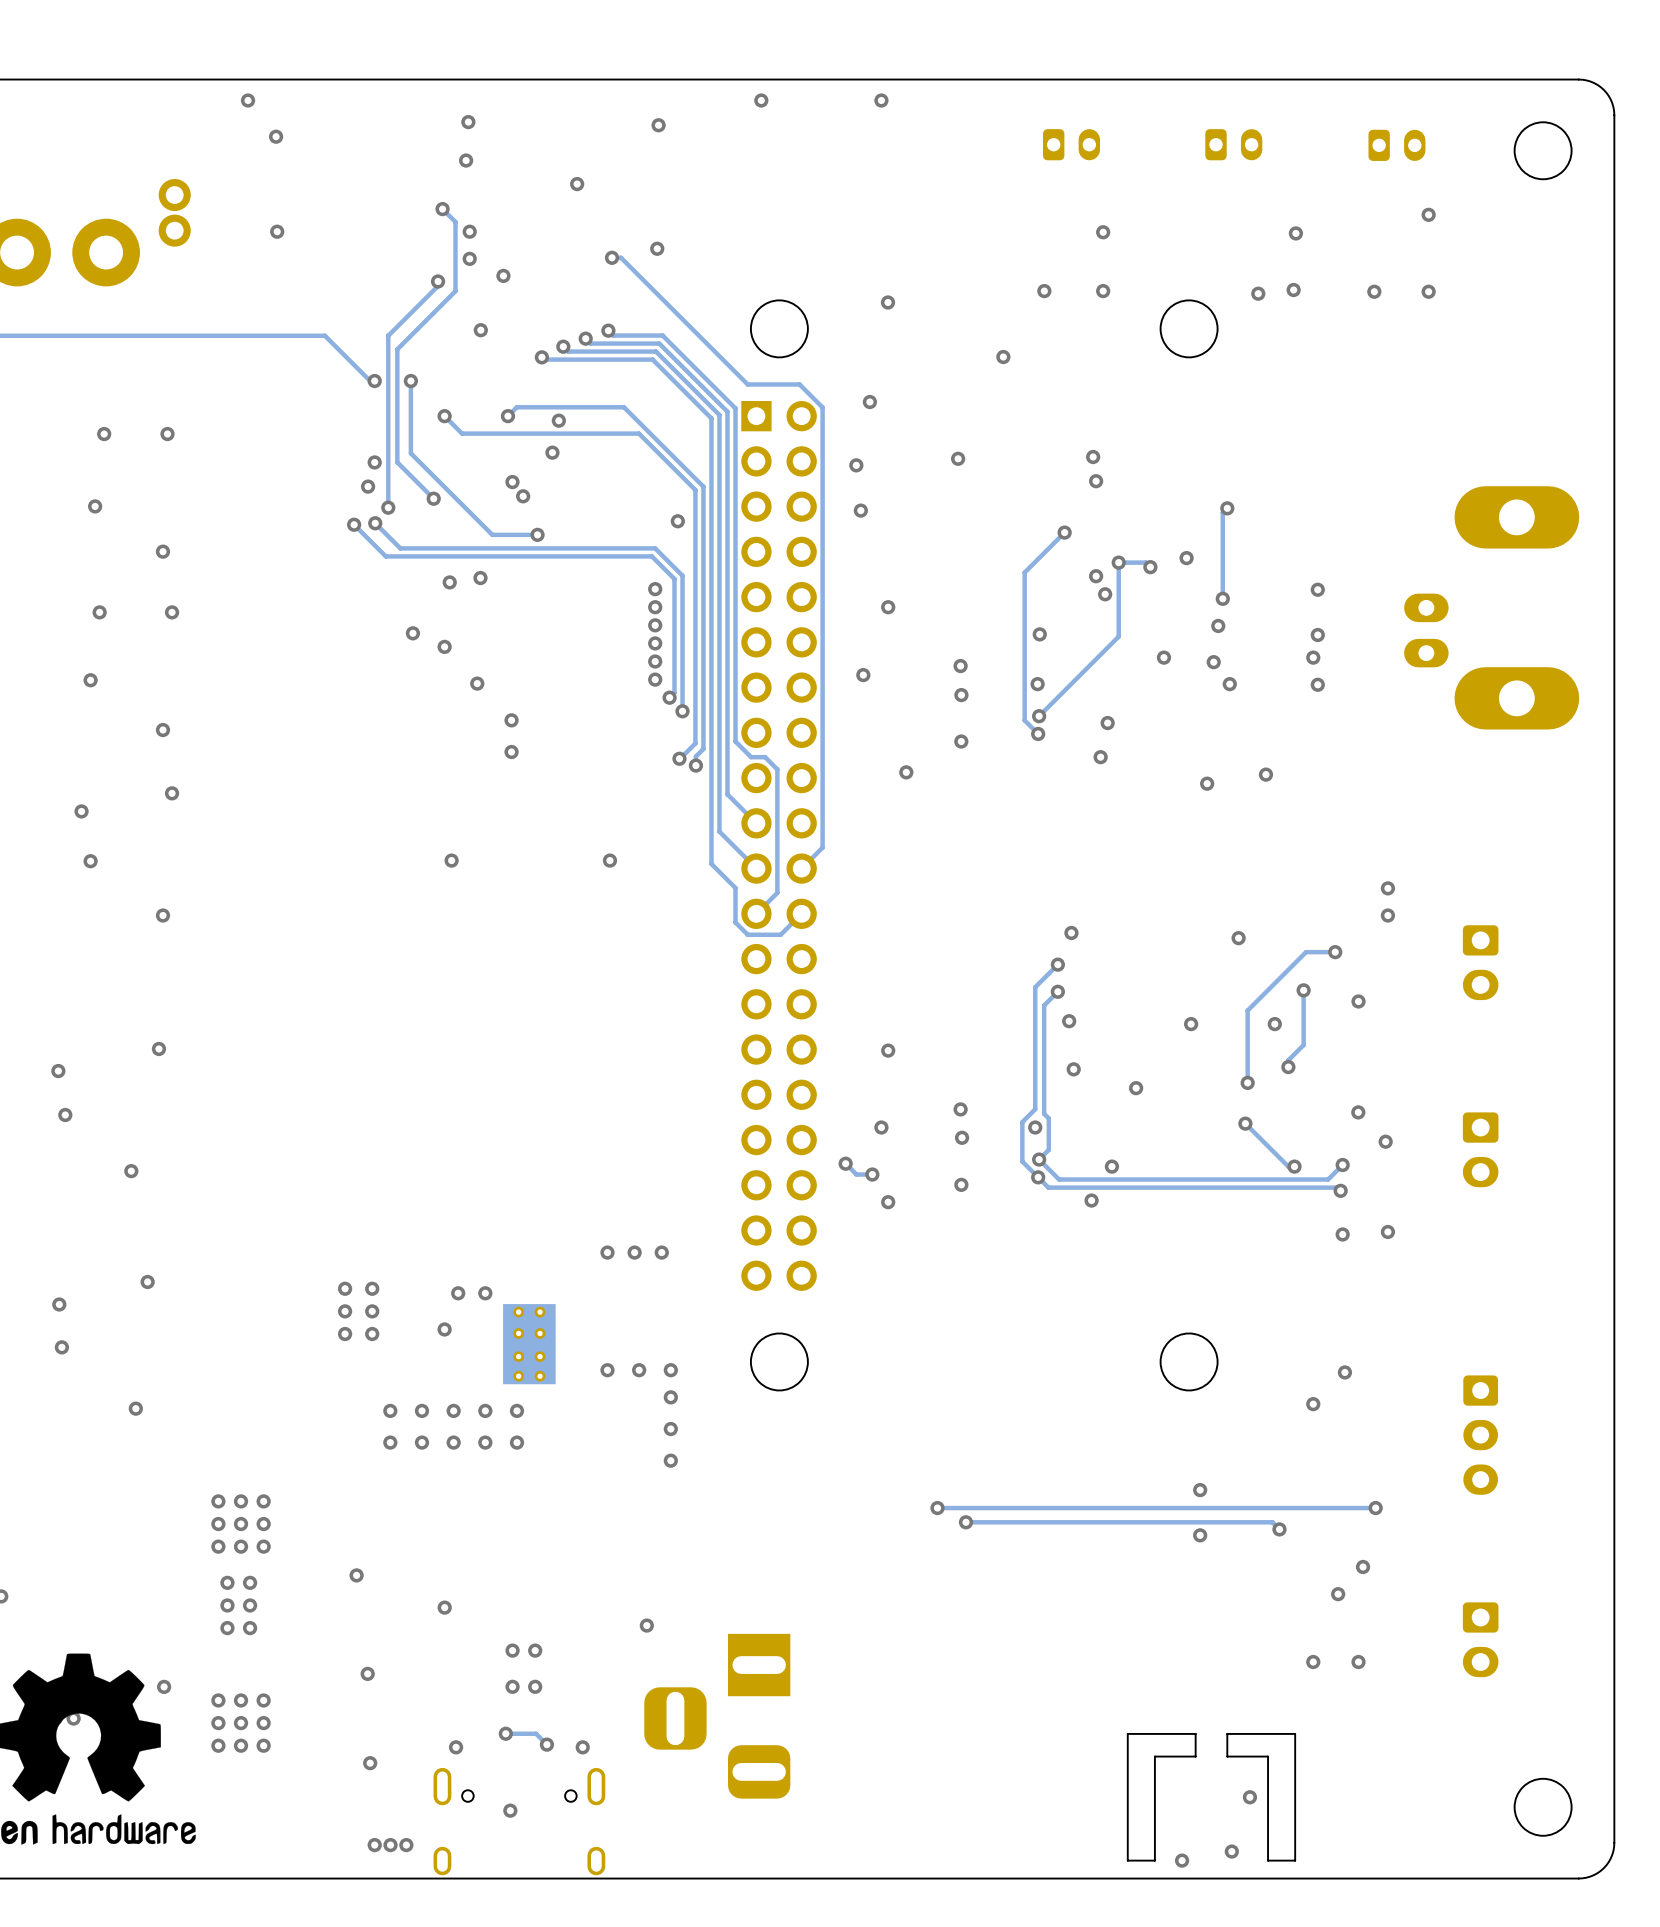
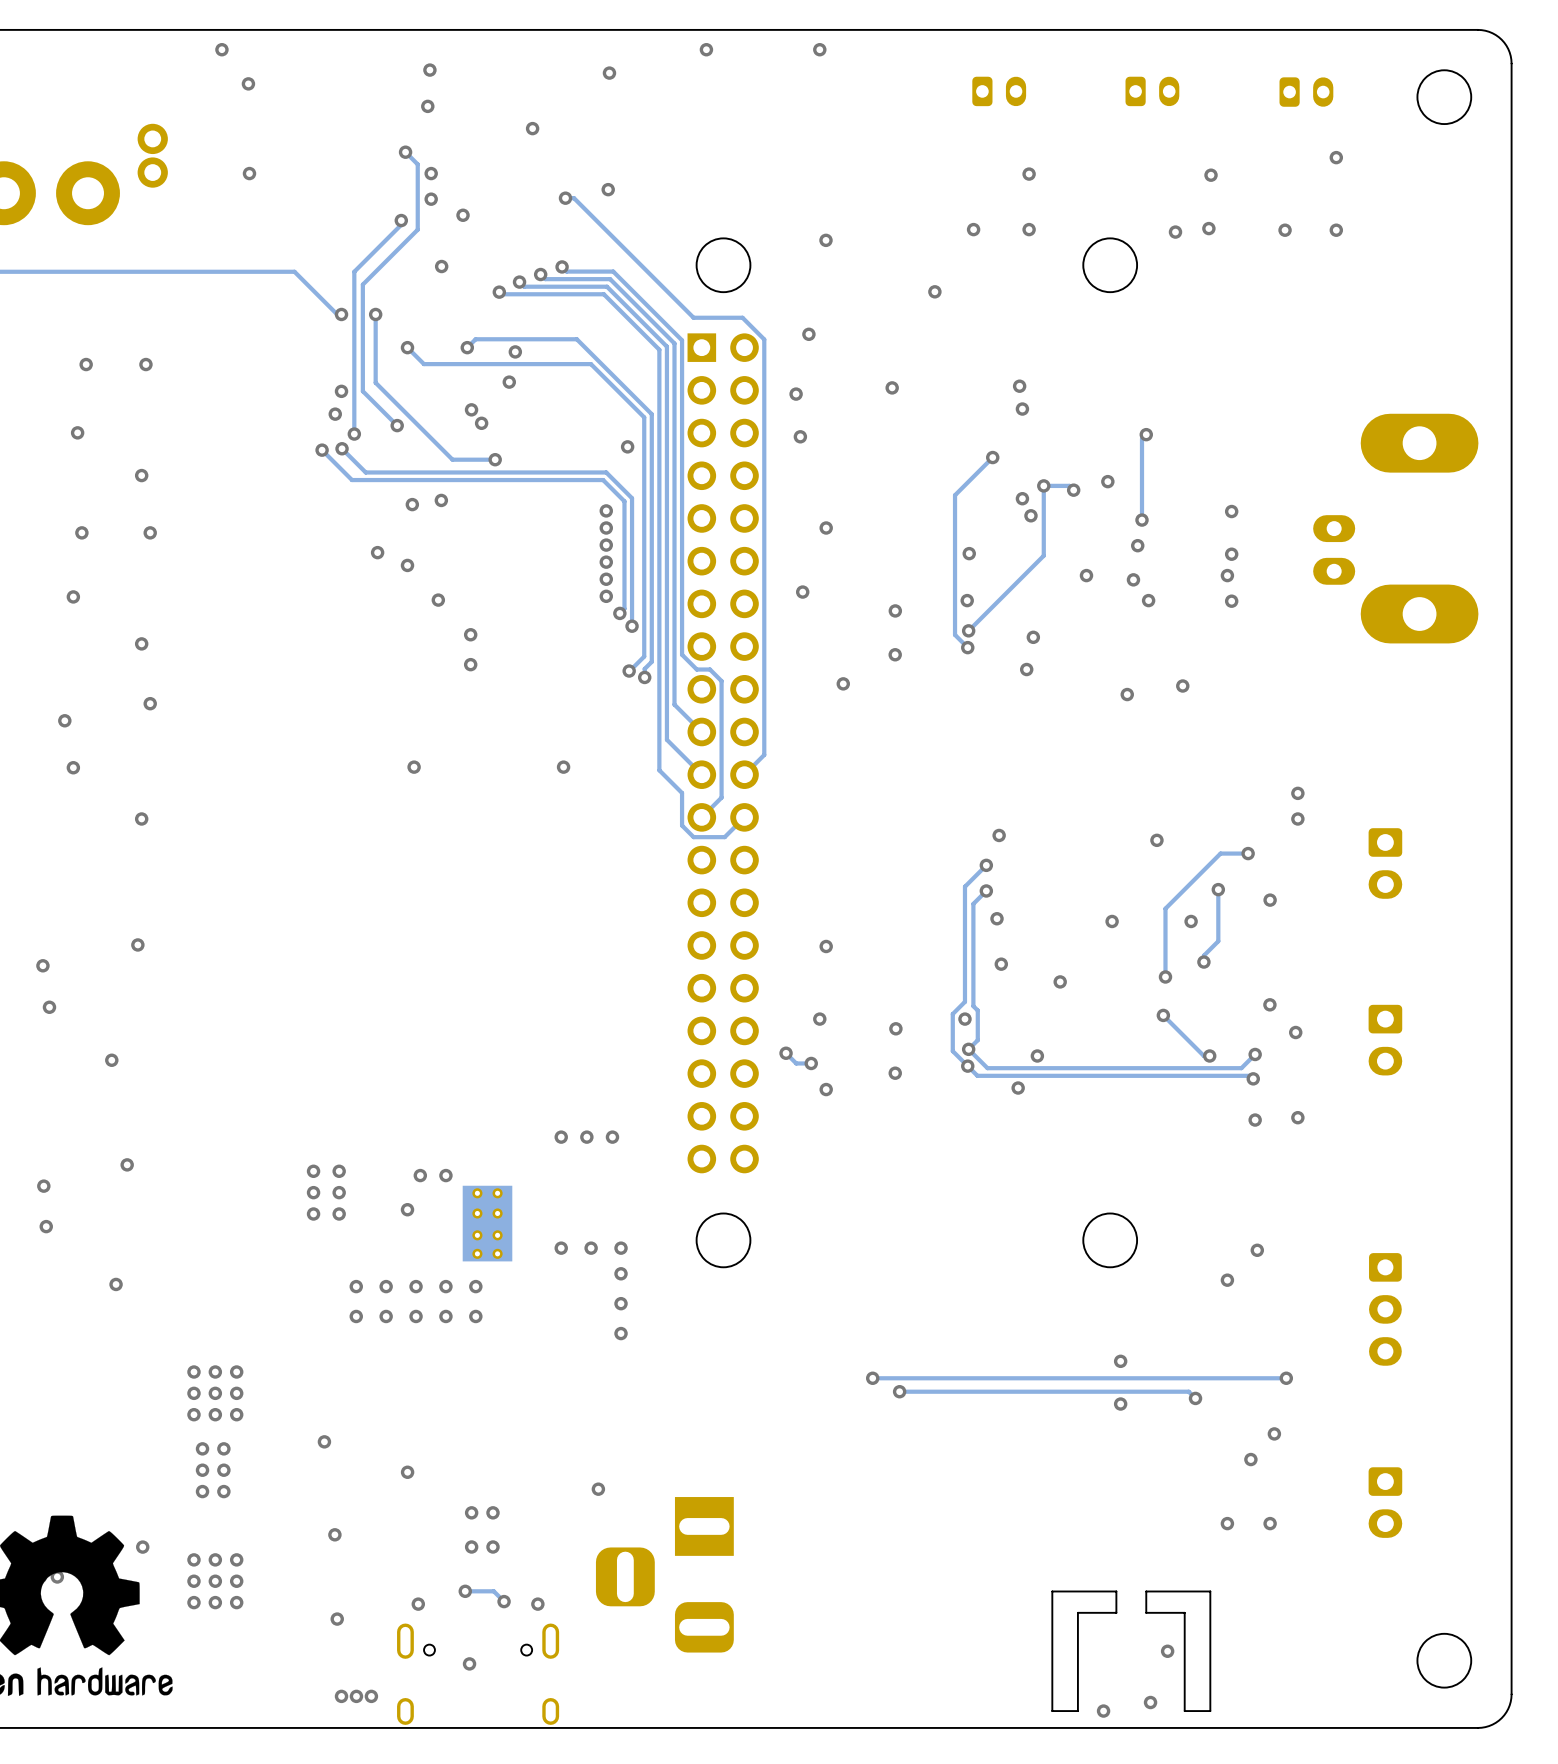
via: (960, 666) -> none
via: (960, 1109) -> none

